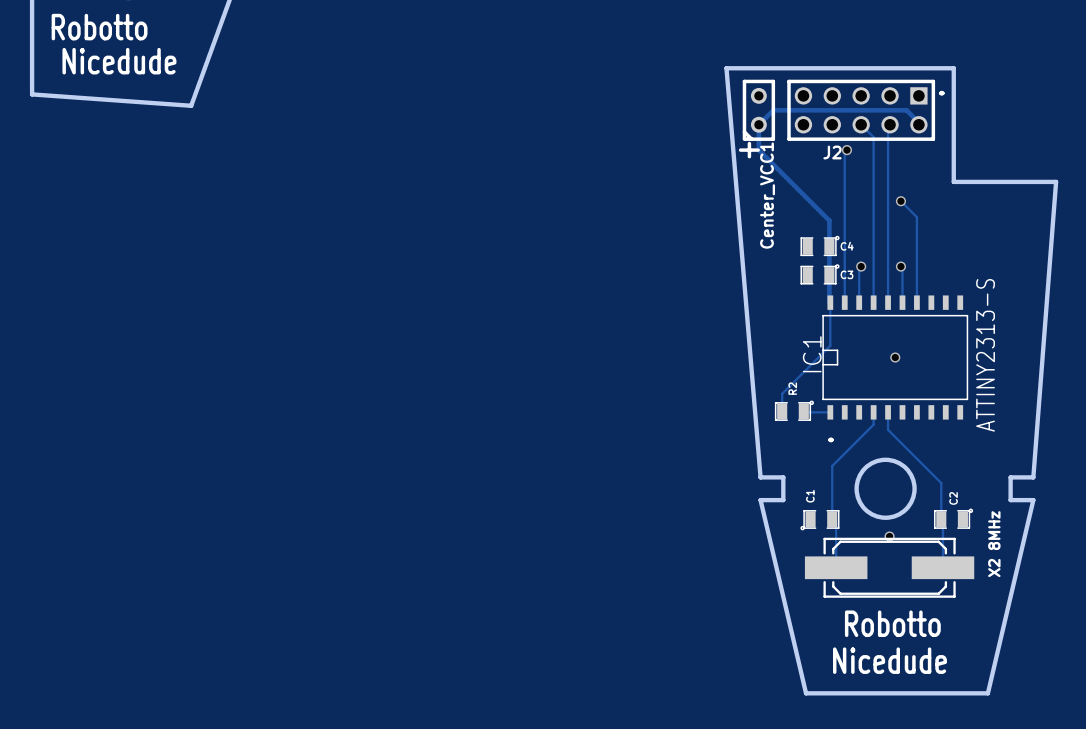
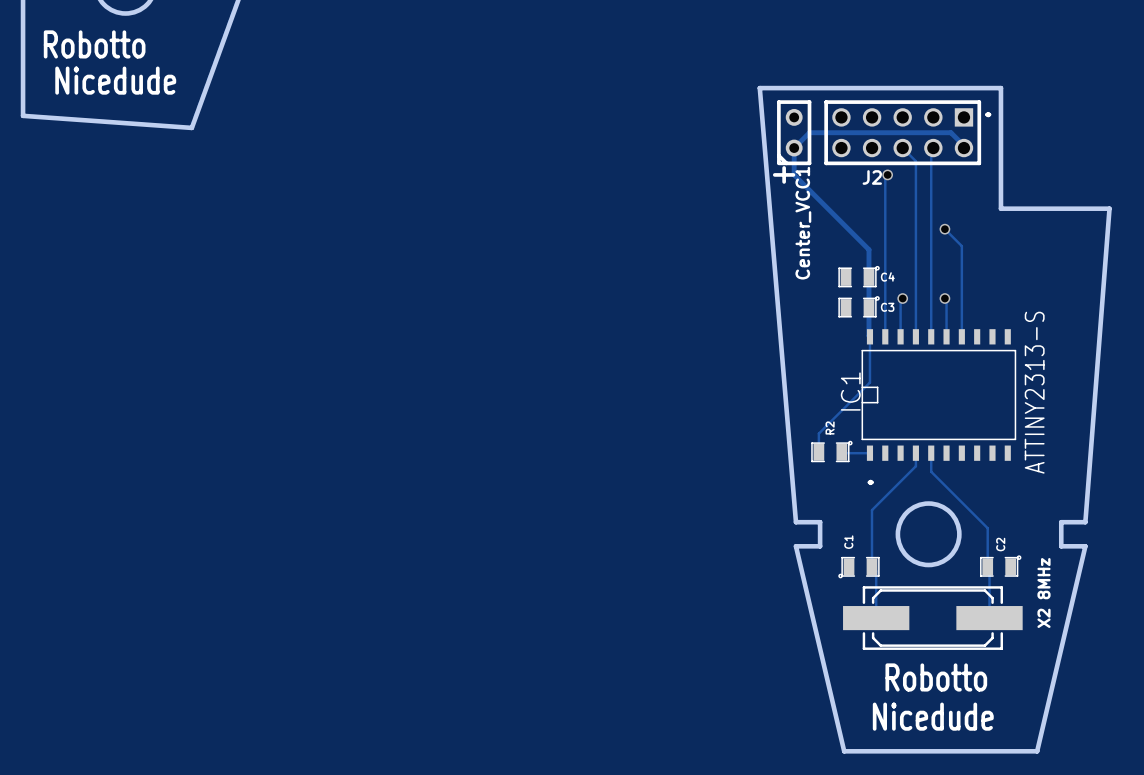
via: (895, 357) -> none
via: (889, 536) -> none

